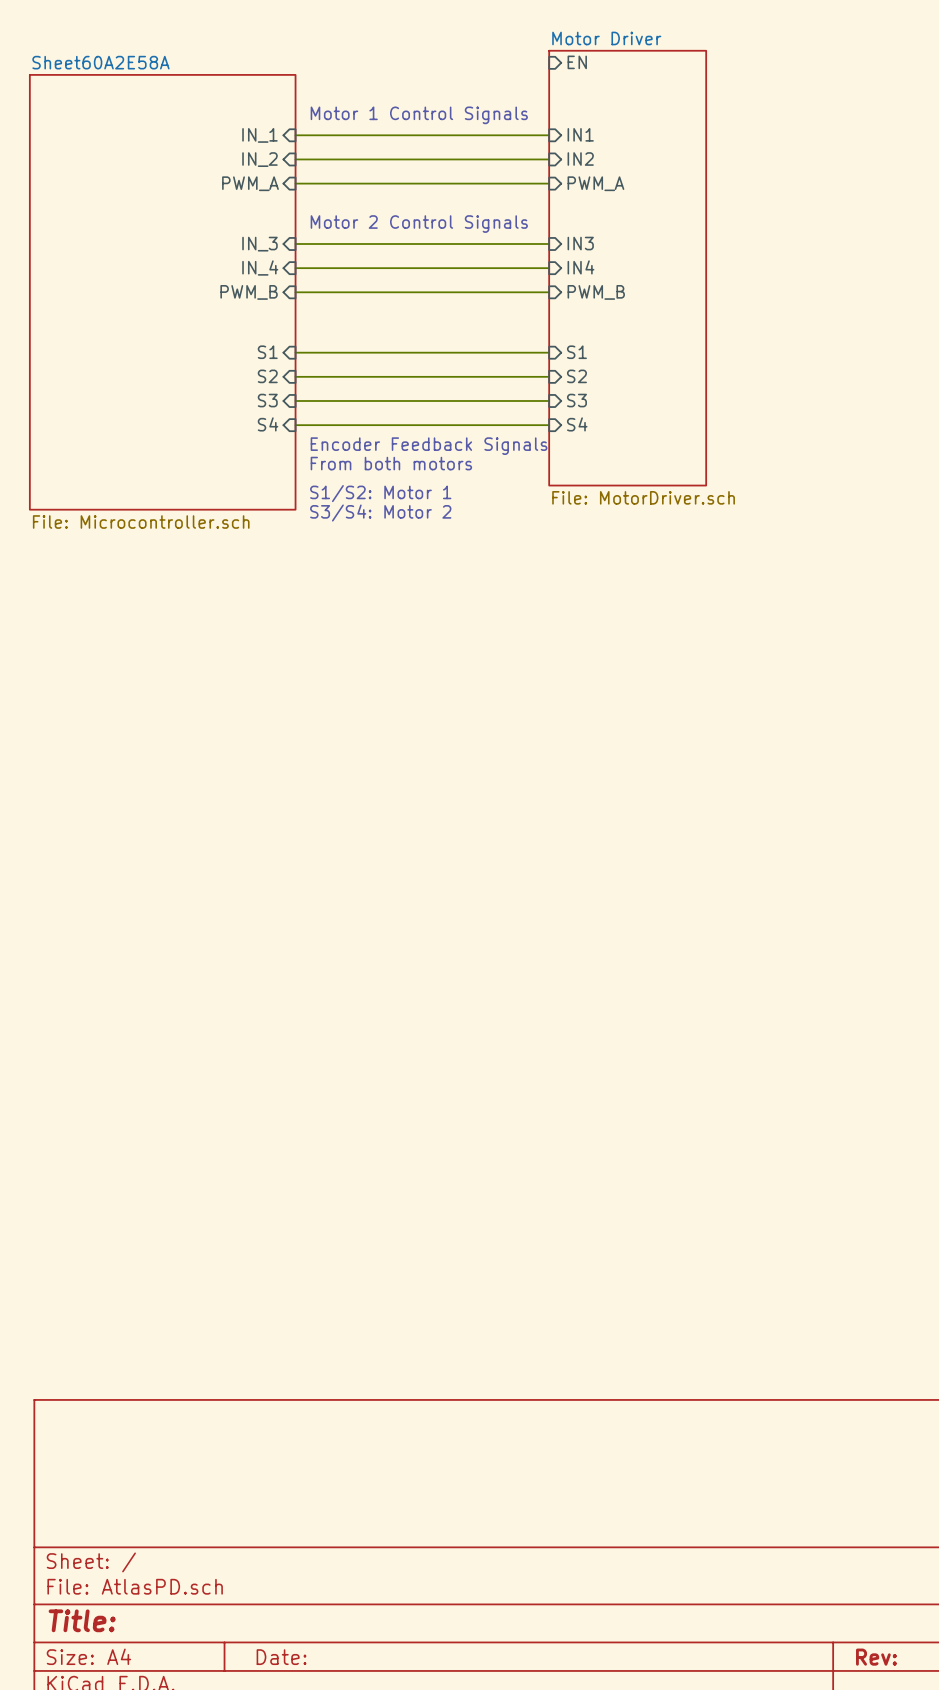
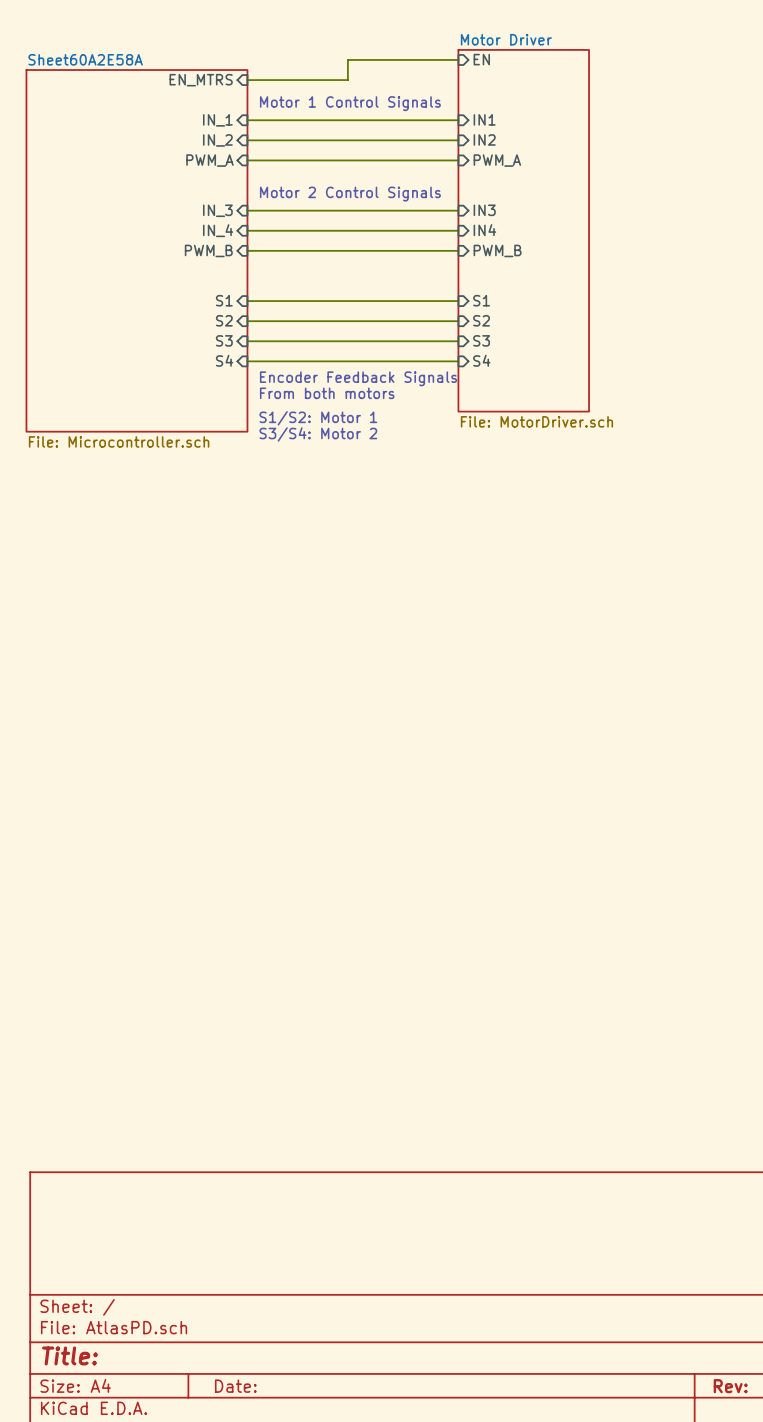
wire: none -> (458, 59) (347, 59) (347, 80) (247, 80)
sheet pin: none -> EN_MTRS (201, 80)

